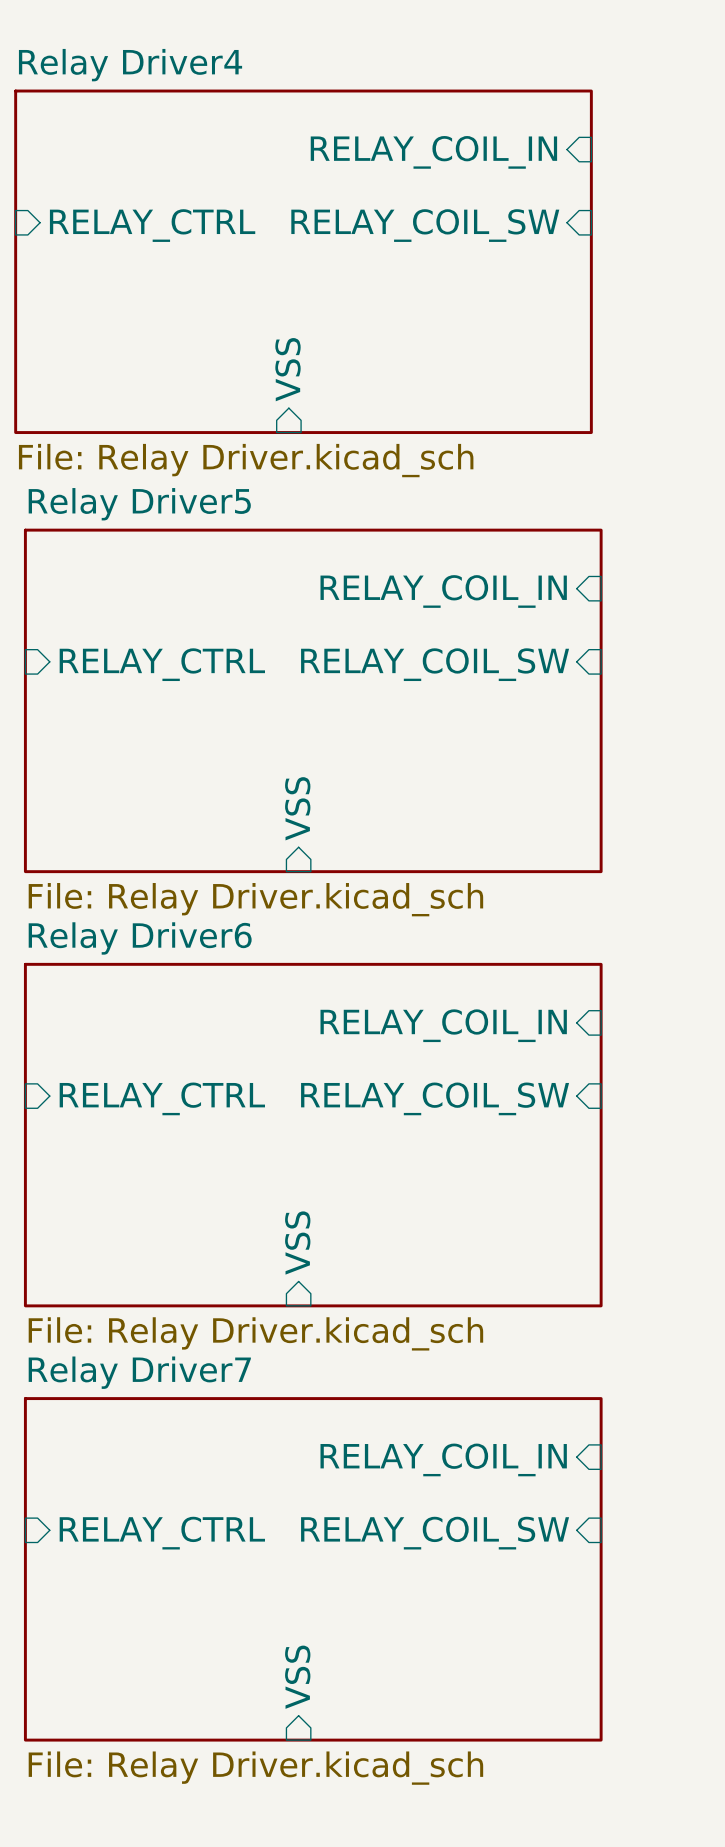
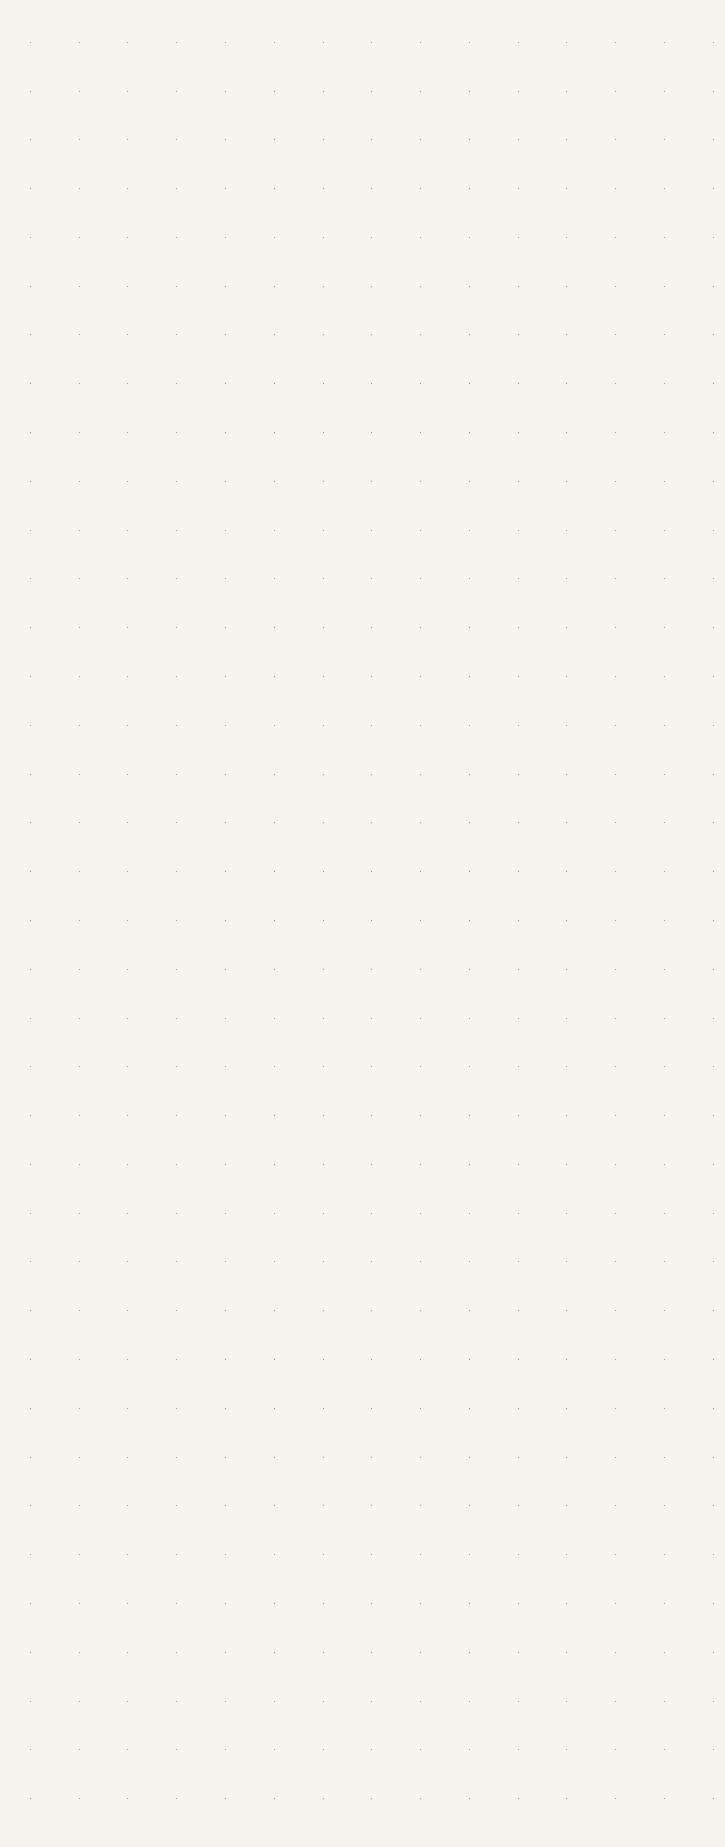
sheet pin: RELAY_COIL_IN (433, 152) -> none
sheet pin: RELAY_CTRL (152, 225) -> none
sheet pin: RELAY_COIL_SW (425, 225) -> none
sheet Relay Driver4: File: Relay Driver.kicad_sch (303, 261) -> none
sheet pin: VSS (287, 369) -> none
sheet pin: RELAY_COIL_IN (443, 591) -> none
sheet pin: RELAY_CTRL (162, 664) -> none
sheet pin: RELAY_COIL_SW (435, 664) -> none
sheet Relay Driver5: File: Relay Driver.kicad_sch (313, 700) -> none
sheet pin: VSS (297, 808) -> none
sheet pin: RELAY_COIL_IN (443, 1025) -> none
sheet pin: RELAY_CTRL (162, 1098) -> none
sheet pin: RELAY_COIL_SW (435, 1098) -> none
sheet Relay Driver6: File: Relay Driver.kicad_sch (313, 1135) -> none
sheet pin: VSS (297, 1243) -> none
sheet pin: RELAY_COIL_IN (443, 1459) -> none
sheet pin: RELAY_CTRL (162, 1533) -> none
sheet pin: RELAY_COIL_SW (435, 1533) -> none
sheet Relay Driver7: File: Relay Driver.kicad_sch (313, 1569) -> none
sheet pin: VSS (297, 1677) -> none

